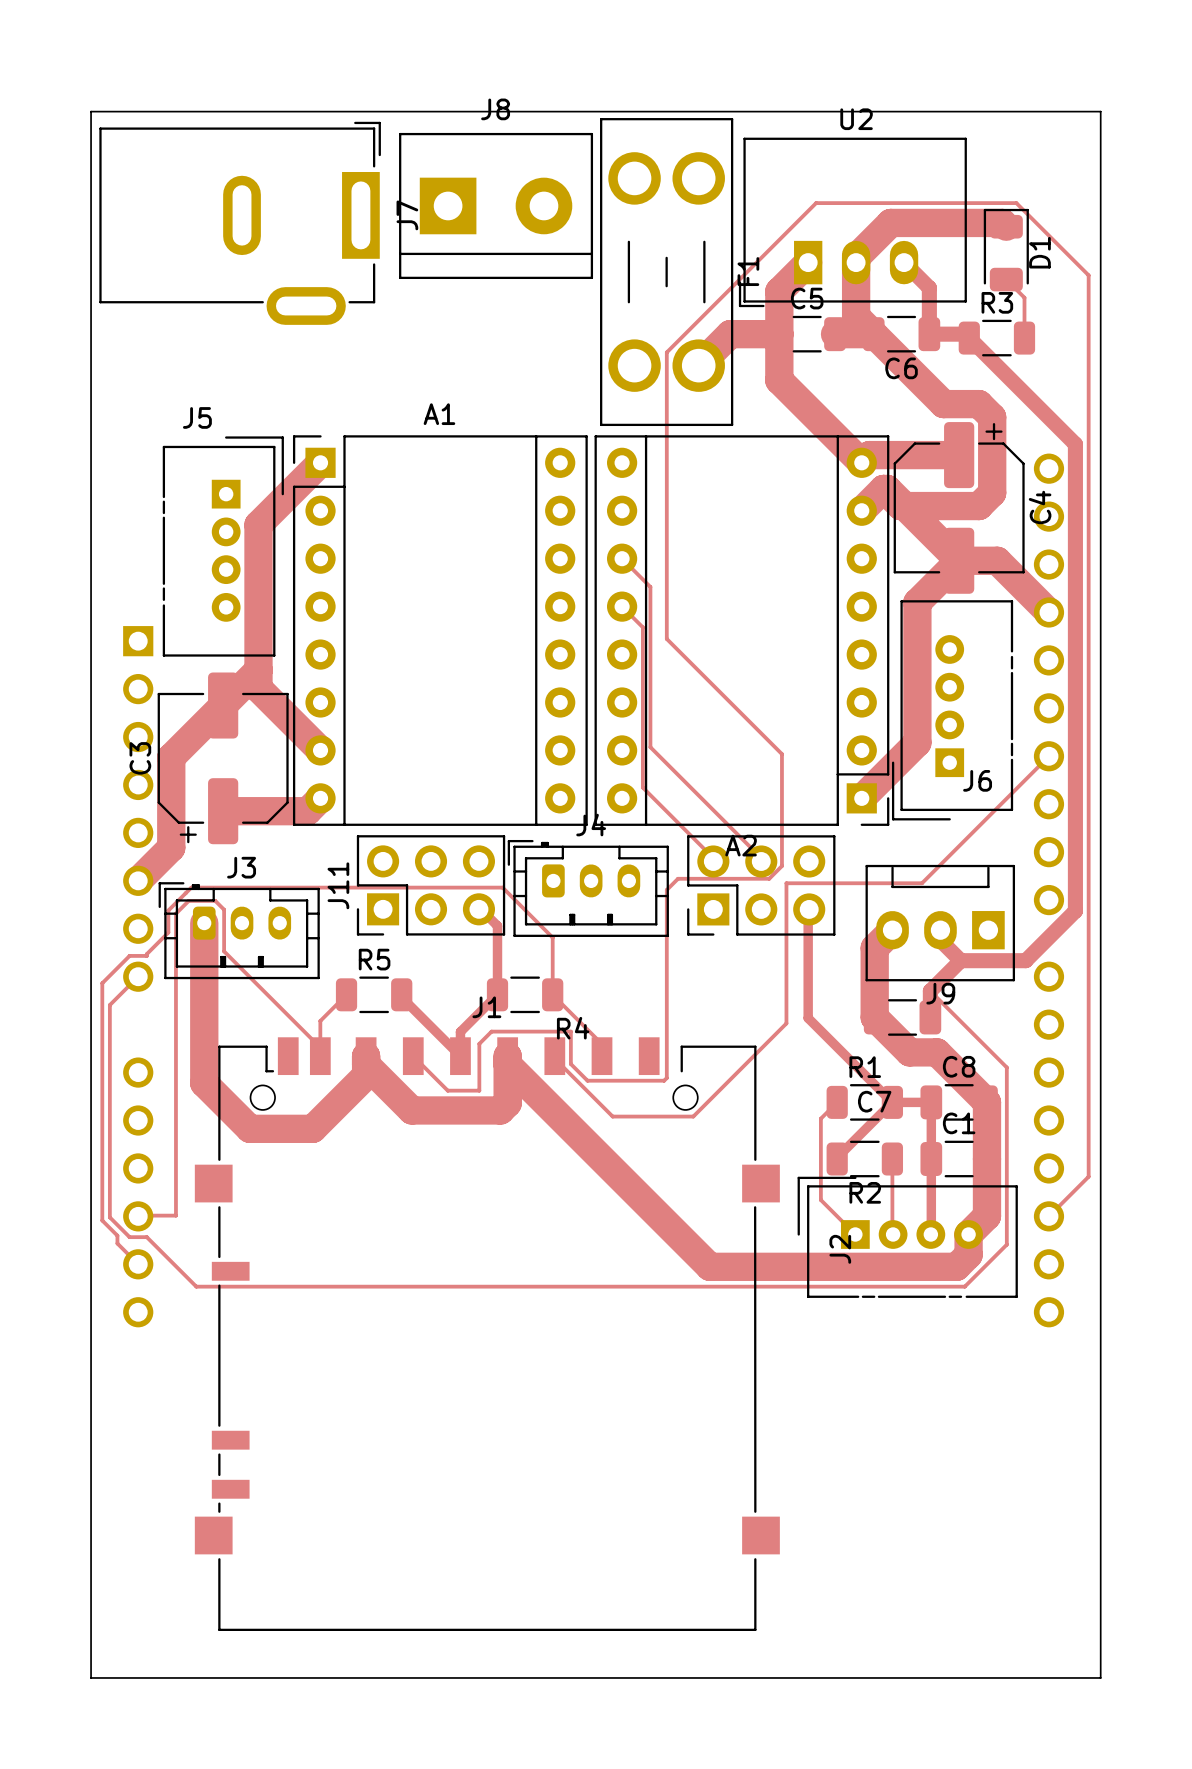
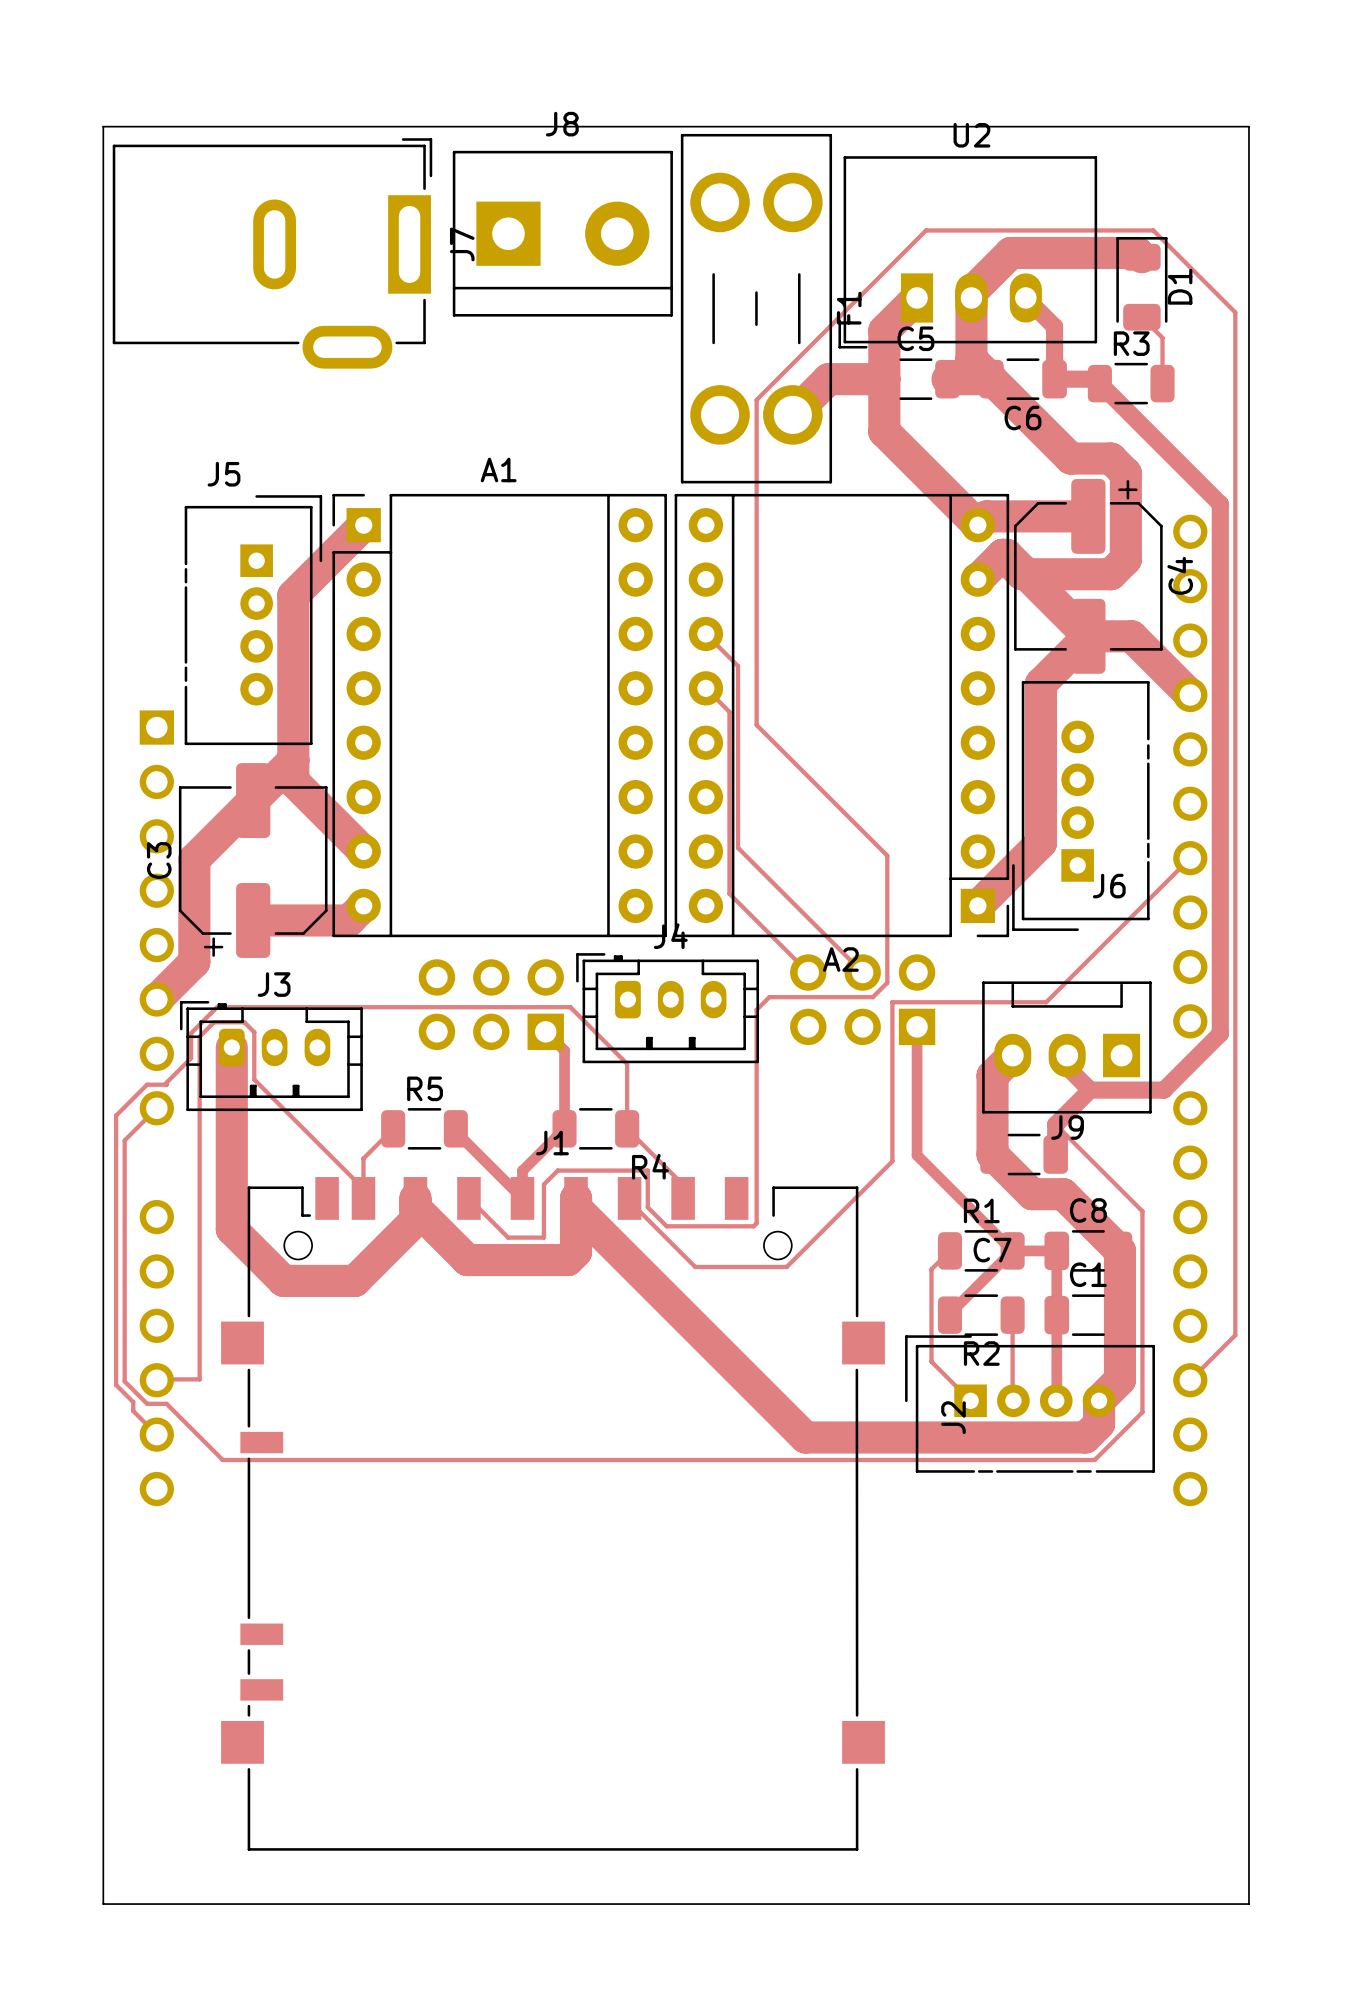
J11 side: top (431, 885) -> bottom (491, 1004)
part side: top (761, 885) -> bottom (862, 999)

